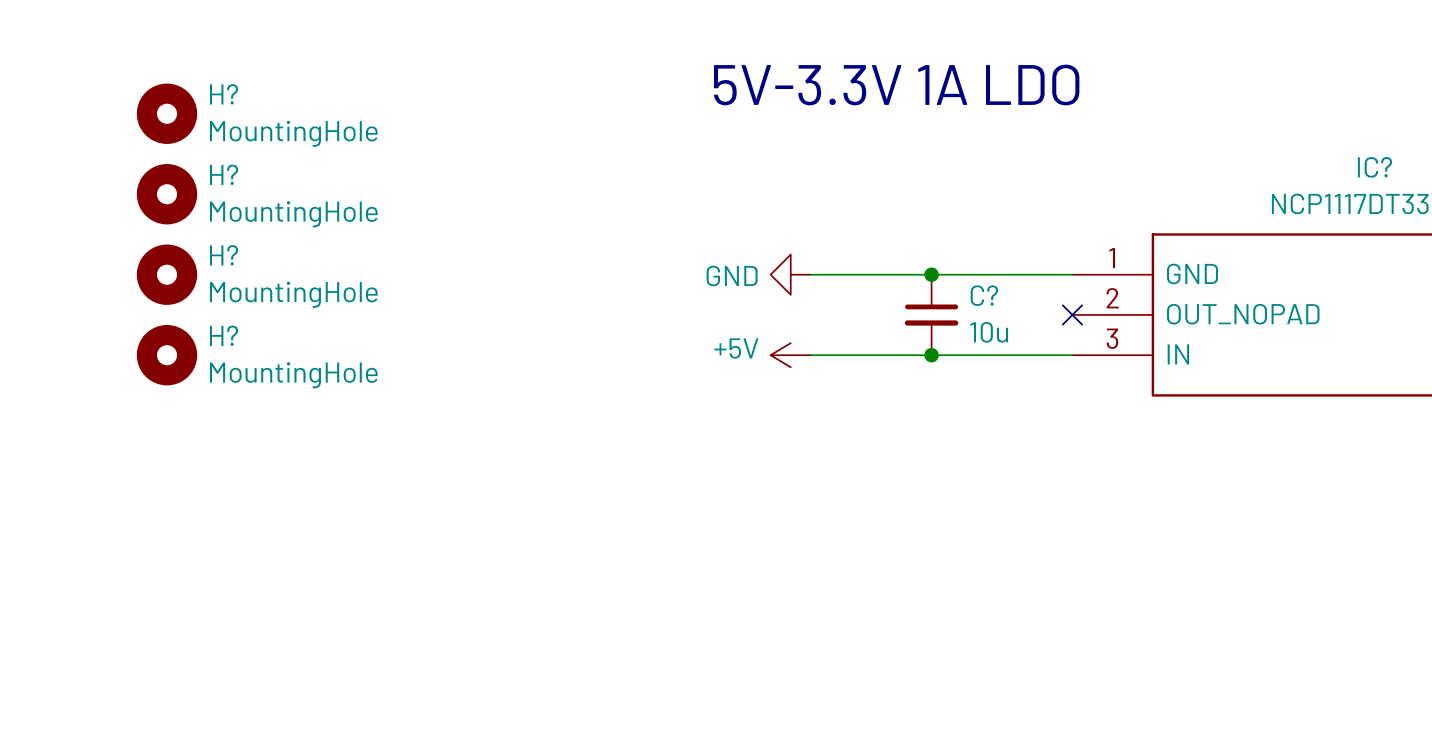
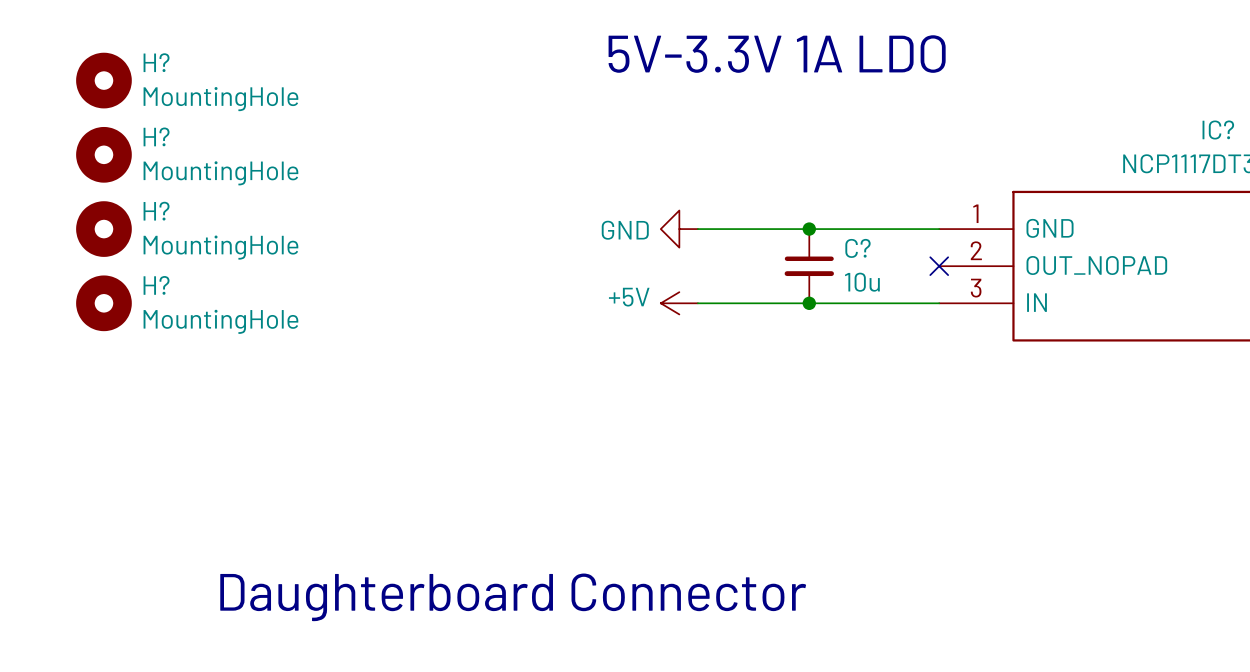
text: none -> Daughterboard Connector (513, 597)

